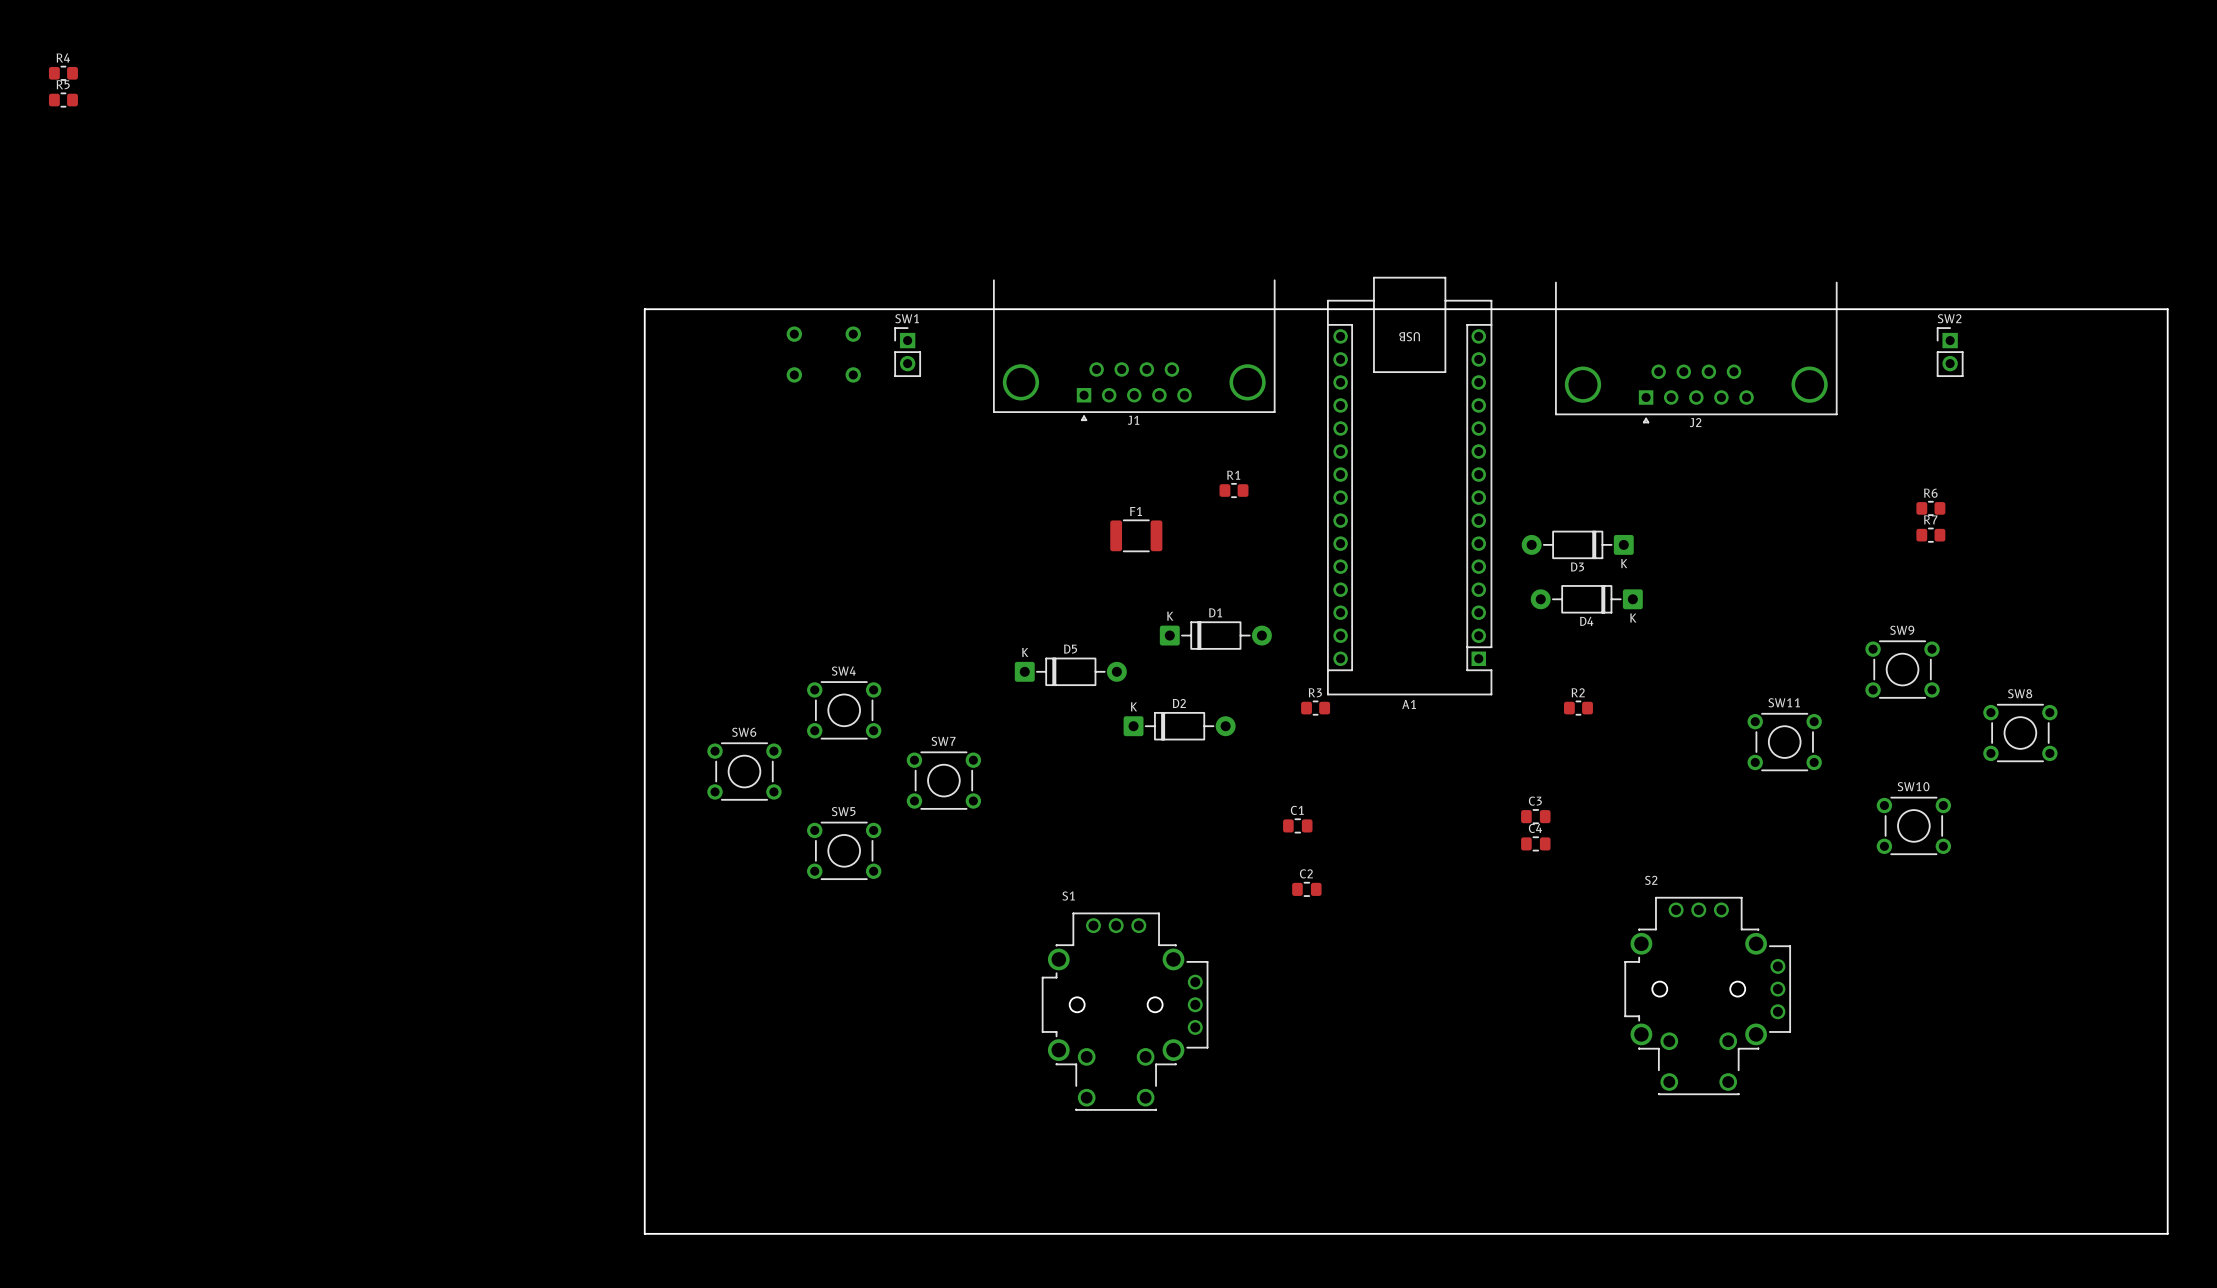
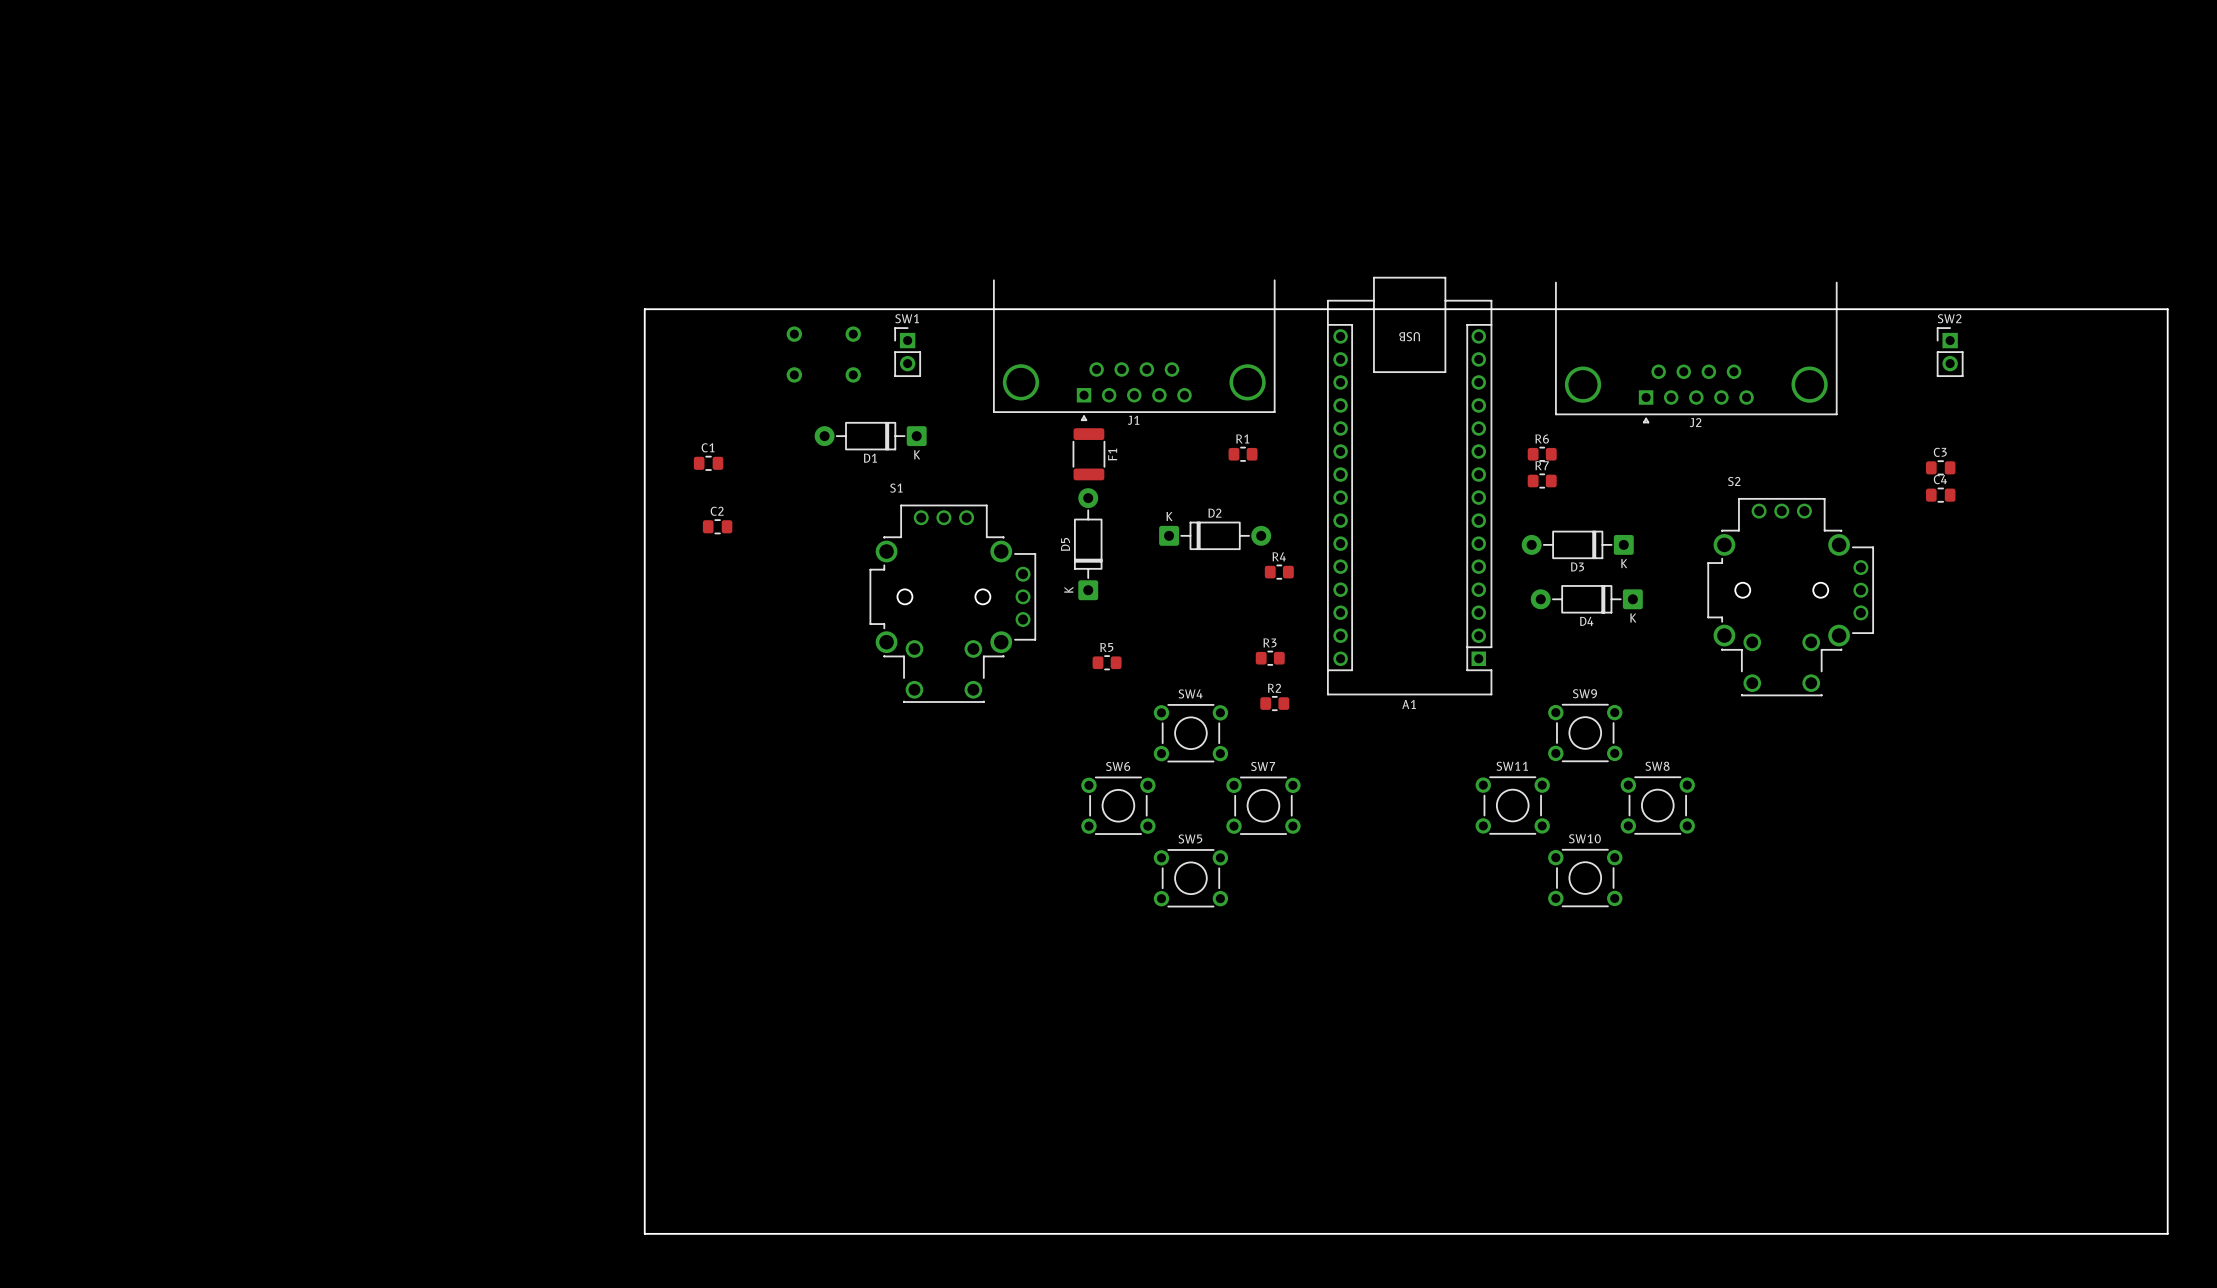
R4 position: (63, 73) -> (1279, 572)
R5 position: (63, 100) -> (1107, 662)
R1 position: (1233, 490) -> (1243, 454)
R6 position: (1930, 508) -> (1542, 454)
F1 rotation: 0° (1136, 535) -> 90° clockwise (1088, 454)
F1 position: (1136, 535) -> (1088, 454)
R7 position: (1930, 535) -> (1542, 480)
D1 rotation: 0° (1215, 635) -> 180° (870, 436)
D1 position: (1215, 635) -> (870, 436)
SW9 position: (1902, 669) -> (1585, 733)
D5 rotation: 0° (1070, 671) -> 90° counterclockwise (1088, 544)
D5 position: (1070, 671) -> (1088, 544)
R3 position: (1315, 708) -> (1270, 658)
R2 position: (1578, 708) -> (1274, 703)
SW4 position: (844, 710) -> (1190, 733)
D2 position: (1179, 726) -> (1215, 535)
SW8 position: (2020, 733) -> (1657, 805)
SW11 position: (1784, 742) -> (1512, 805)
SW6 position: (744, 771) -> (1118, 805)
SW7 position: (943, 780) -> (1263, 805)
C3 position: (1535, 816) -> (1940, 467)
C1 position: (1297, 825) -> (708, 463)
SW10 position: (1913, 825) -> (1585, 878)
C4 position: (1535, 843) -> (1940, 495)
SW5 position: (844, 850) -> (1190, 878)
C2 position: (1306, 889) -> (717, 526)
S2 position: (1707, 995) -> (1790, 597)
S1 position: (1125, 1011) -> (952, 603)

